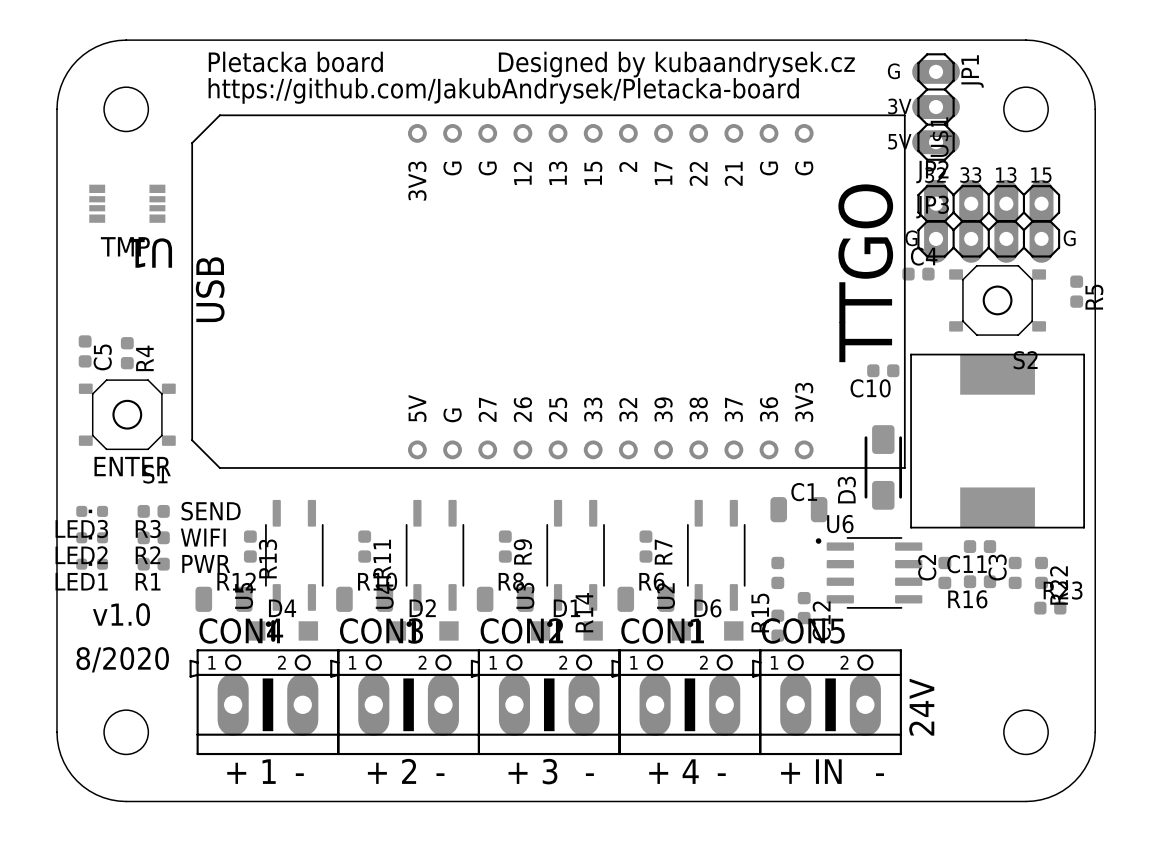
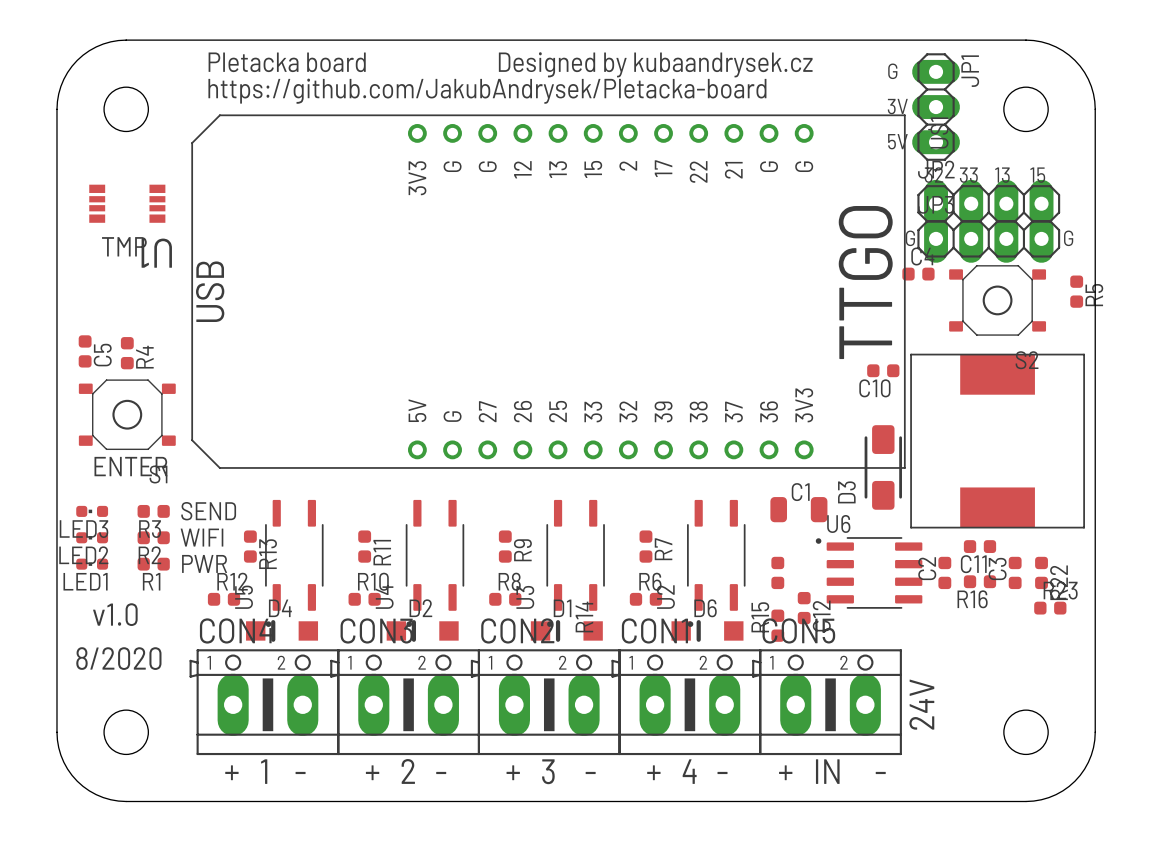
R12 footprint: [195, 586, 253, 612] -> [207, 592, 241, 606]
R10 footprint: [336, 586, 394, 612] -> [348, 592, 381, 606]
R8 footprint: [476, 586, 534, 612] -> [489, 592, 522, 606]
R6 footprint: [617, 586, 675, 612] -> [629, 592, 663, 606]

